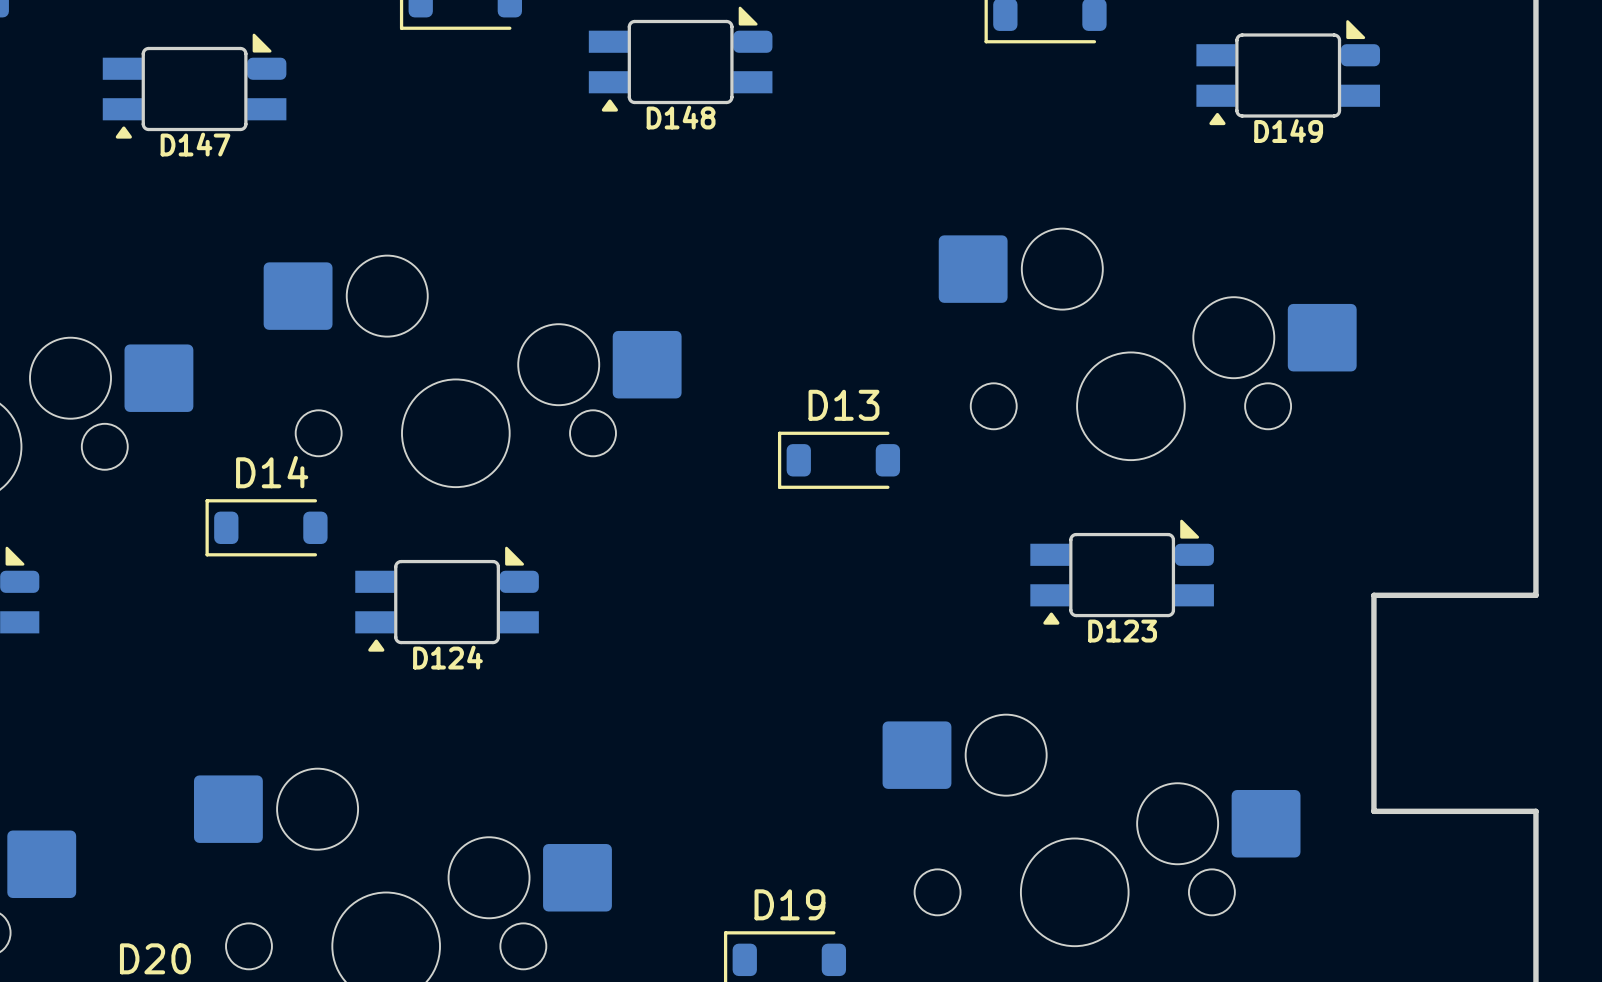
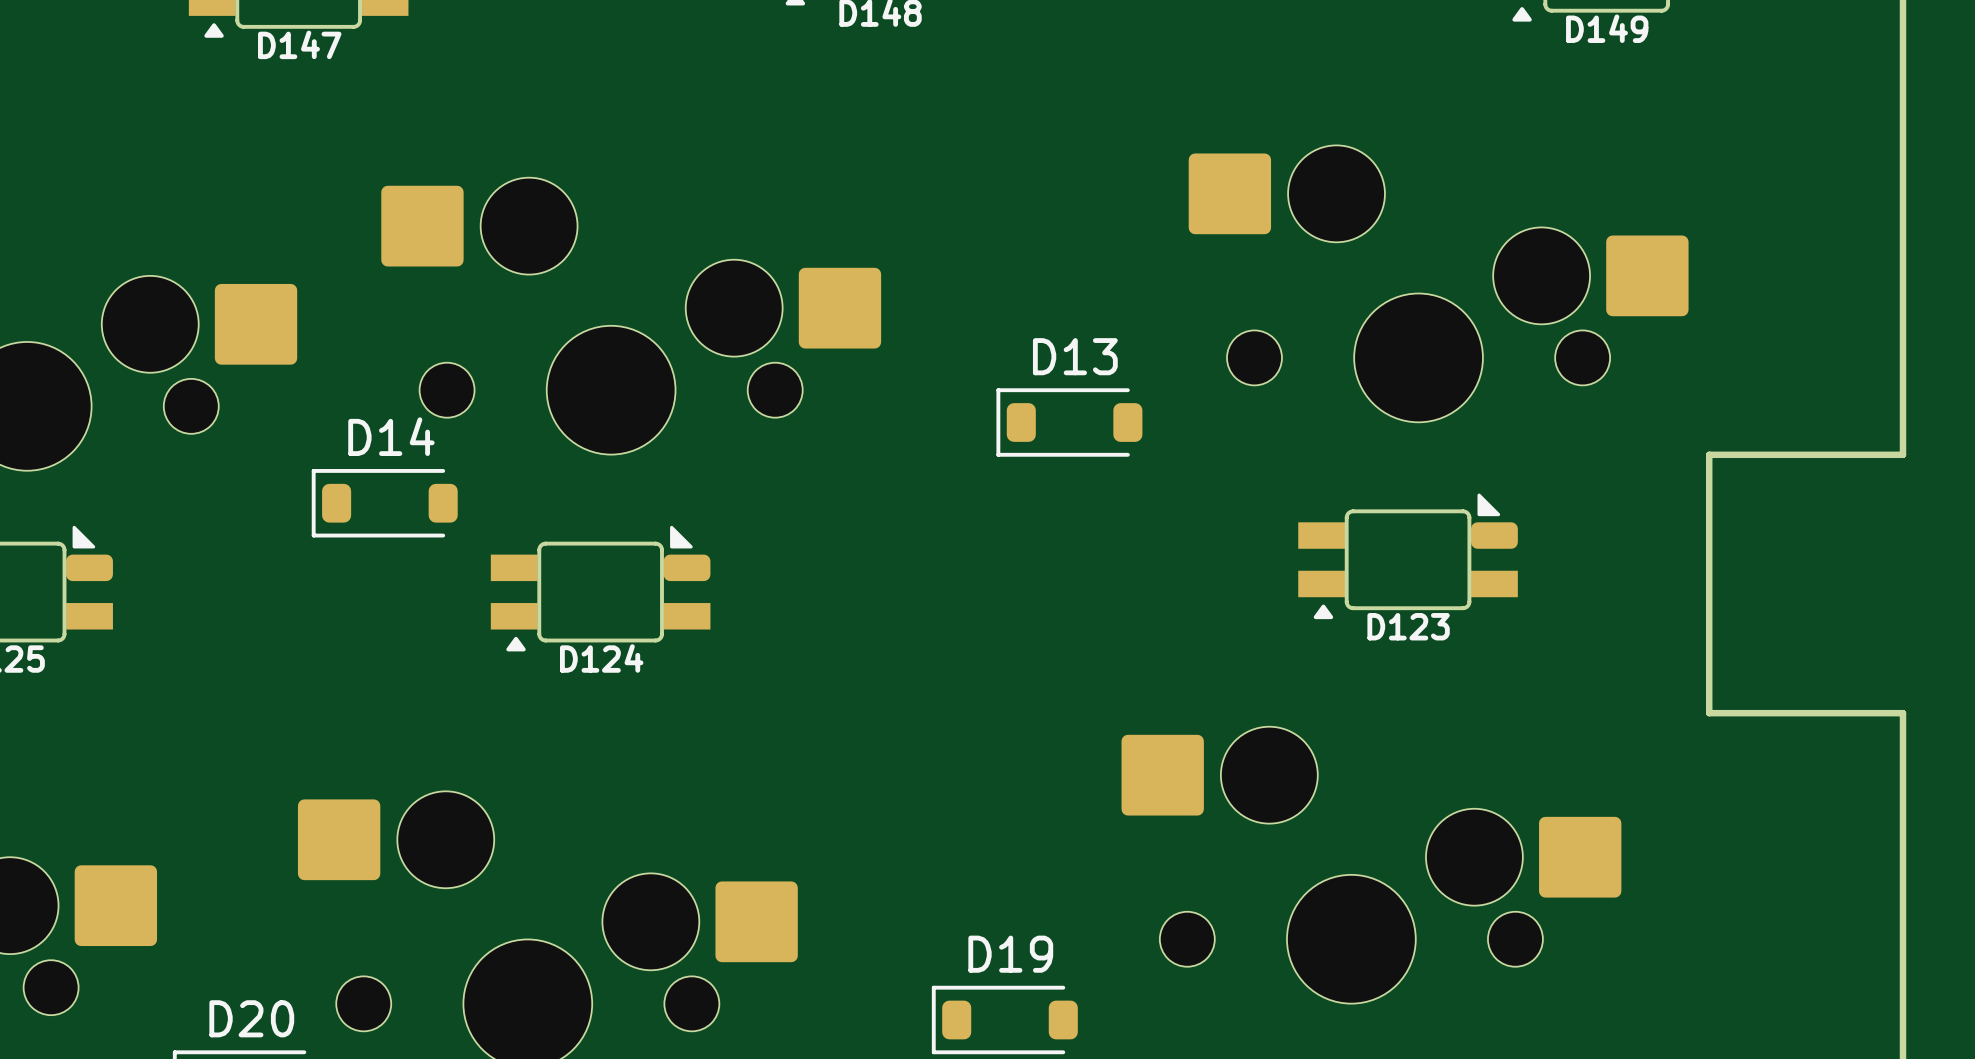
board edge: (1535, 487) (1535, 595) (1373, 595) -> (1903, 454) (1709, 454) (1709, 583)
board edge: (1373, 703) (1373, 811) (1535, 811) -> (1709, 713) (1903, 713) (1903, 842)

